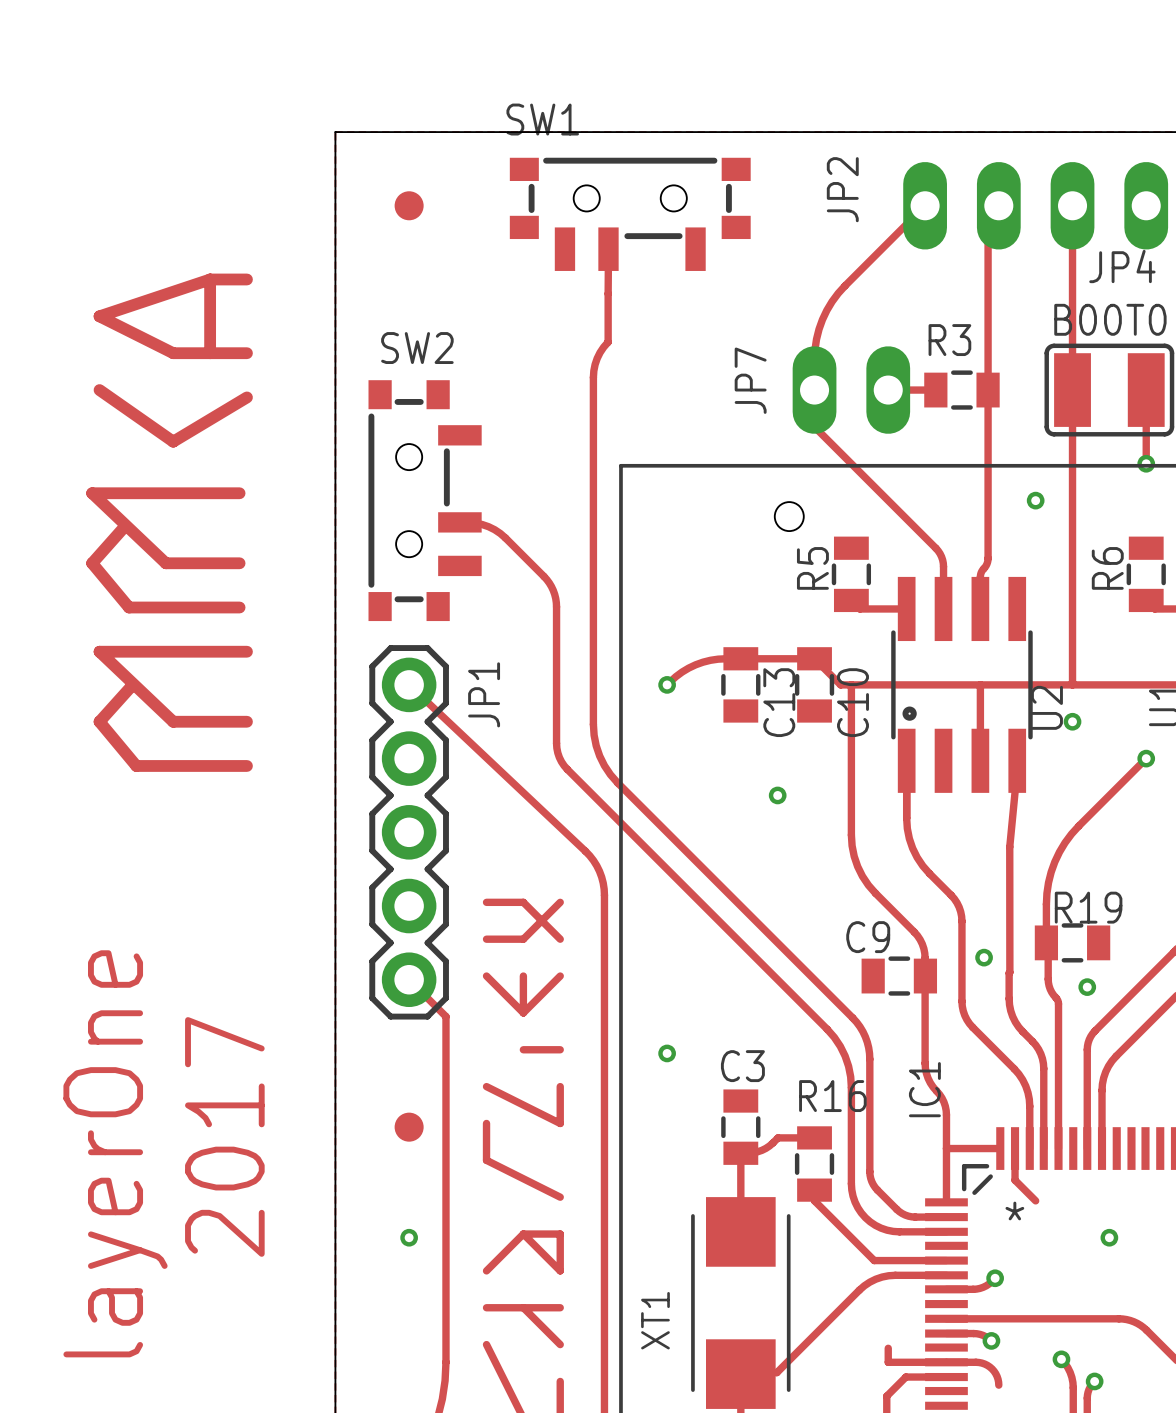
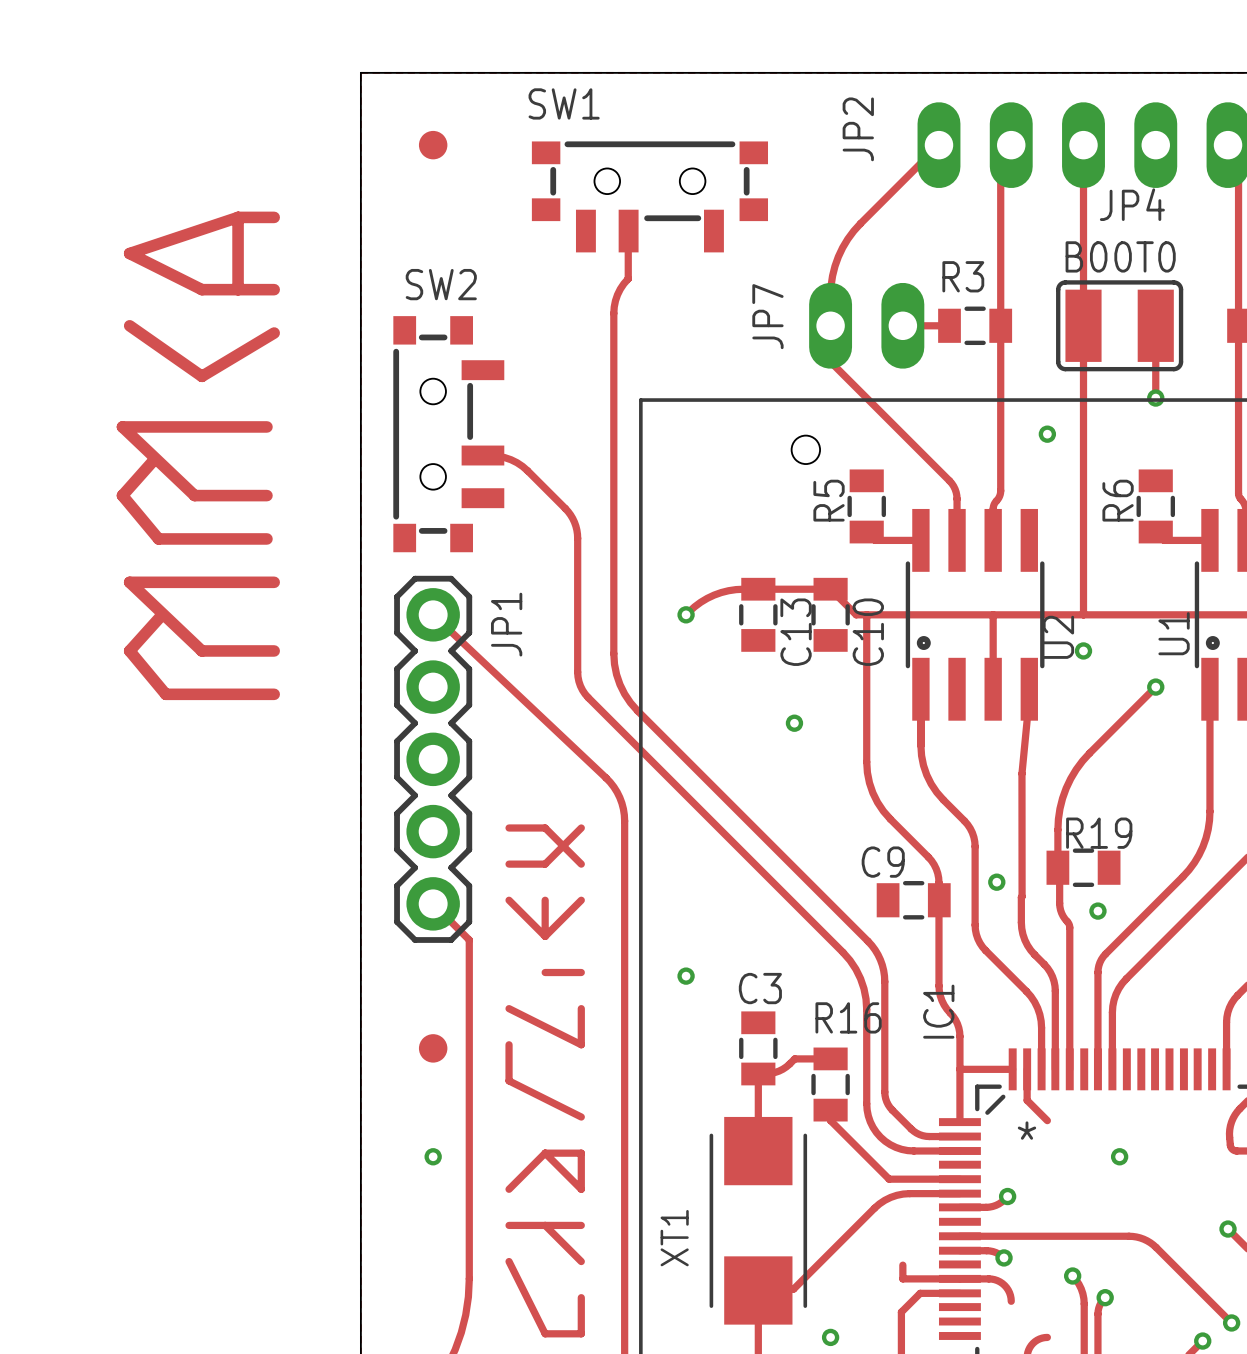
SW1 position: (630, 214) -> (649, 196)
track: (608, 249) (608, 293) -> none
text: 2017 (224, 1136) -> none
text: layerOne (115, 1153) -> none

